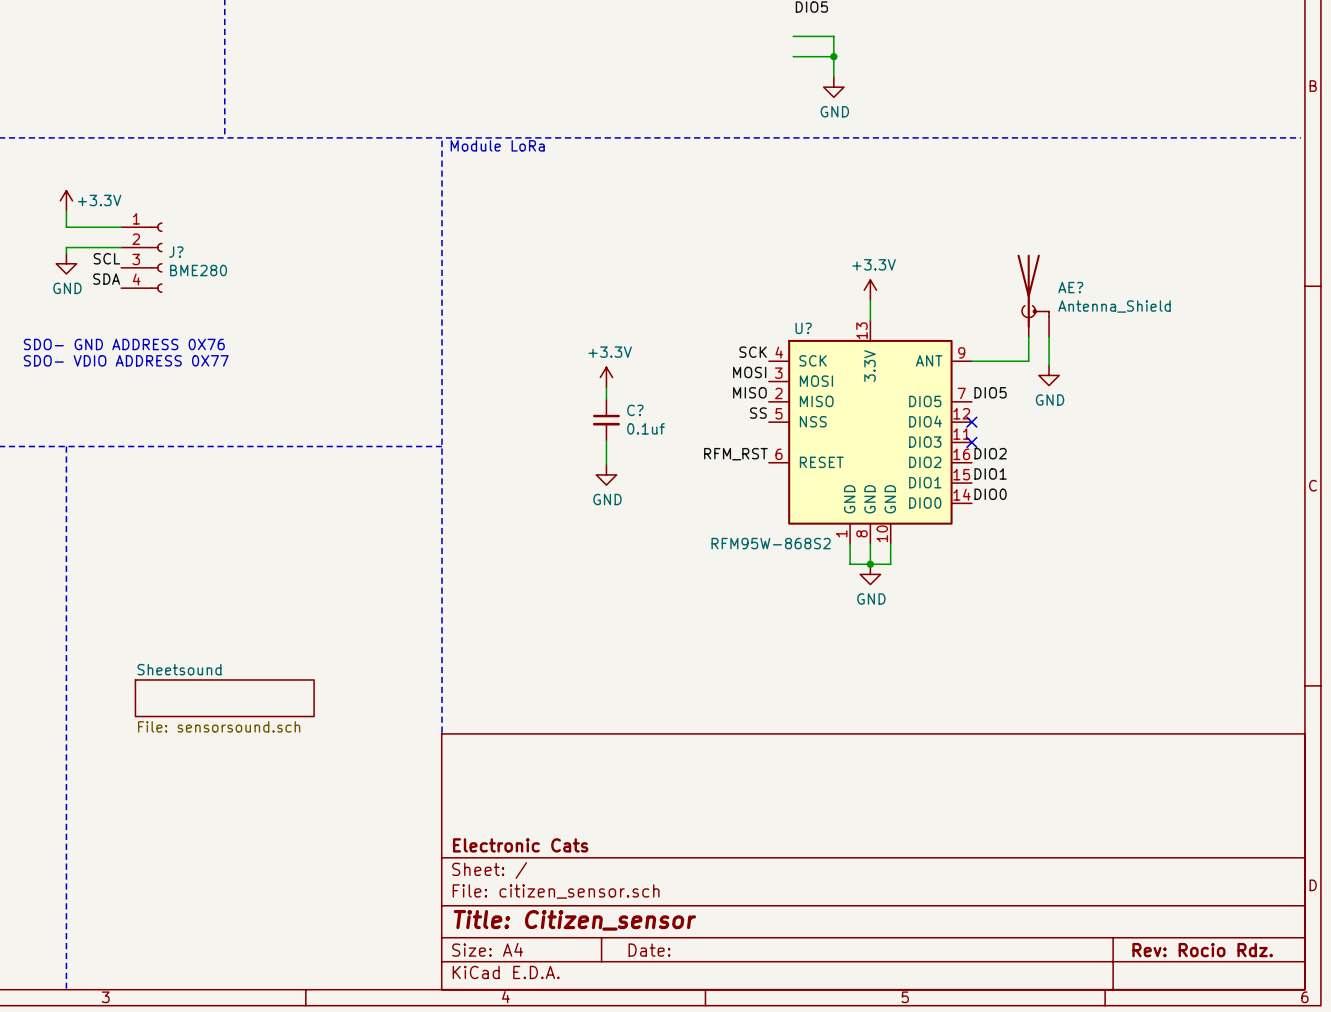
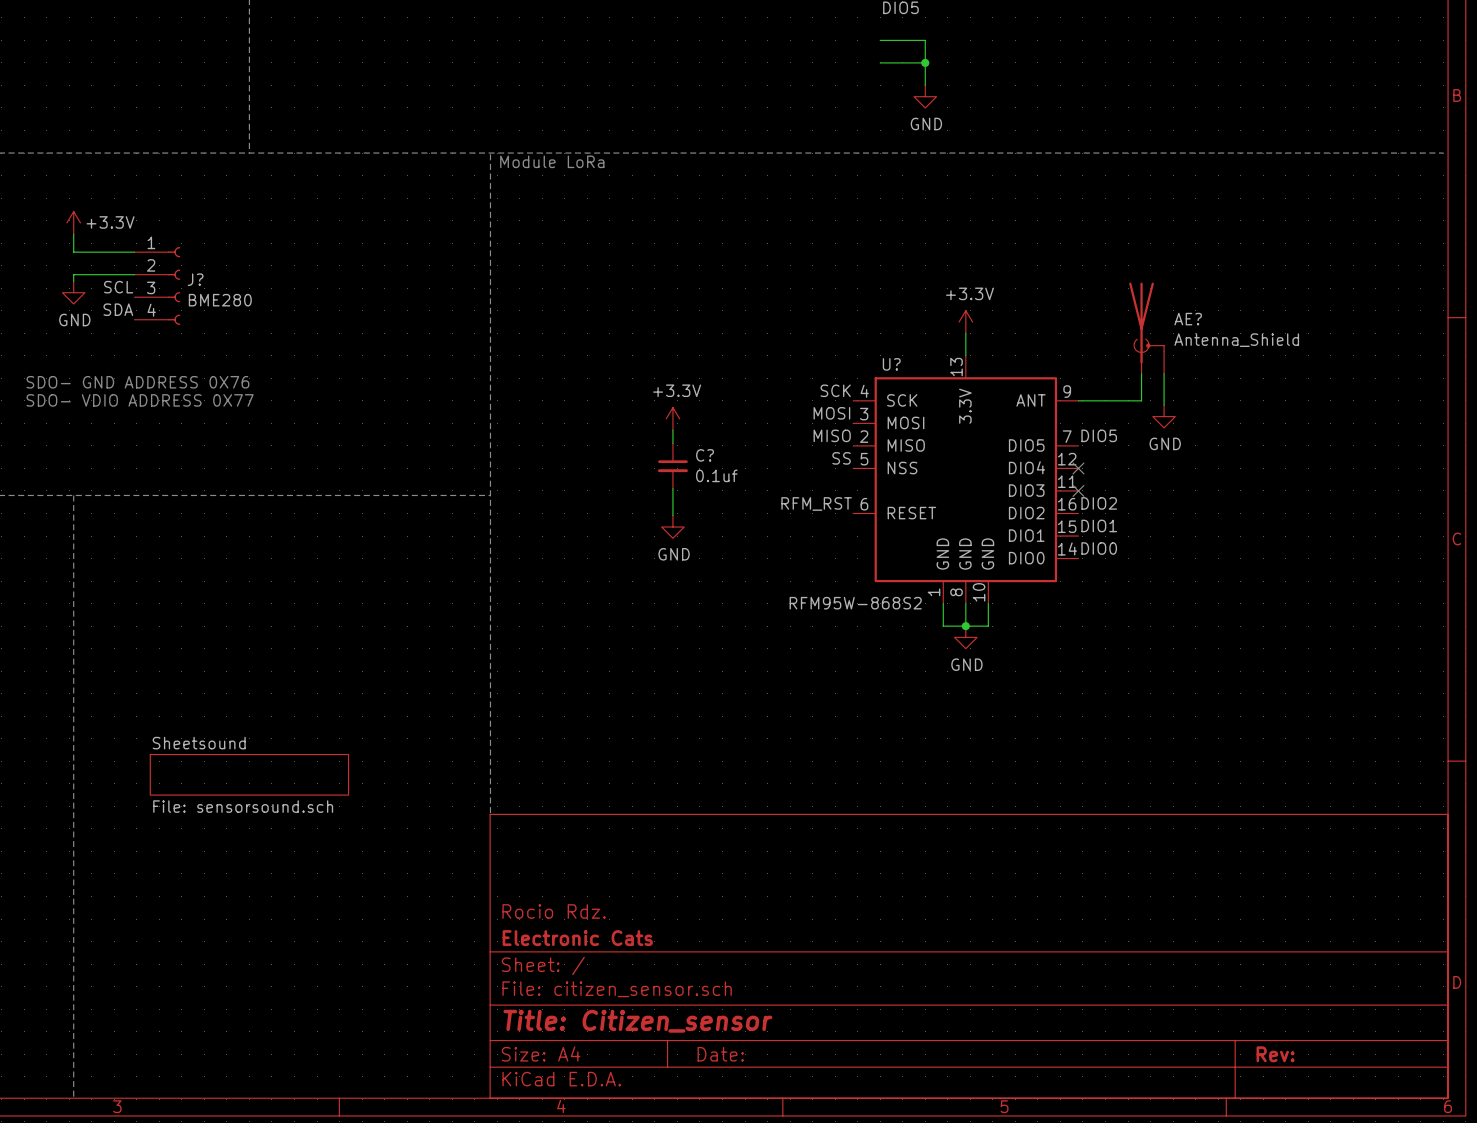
title block: none -> Rocio Rdz. (554, 911)
title block: Rev: Rocio Rdz. (1202, 950) -> Rev: (1275, 1054)

